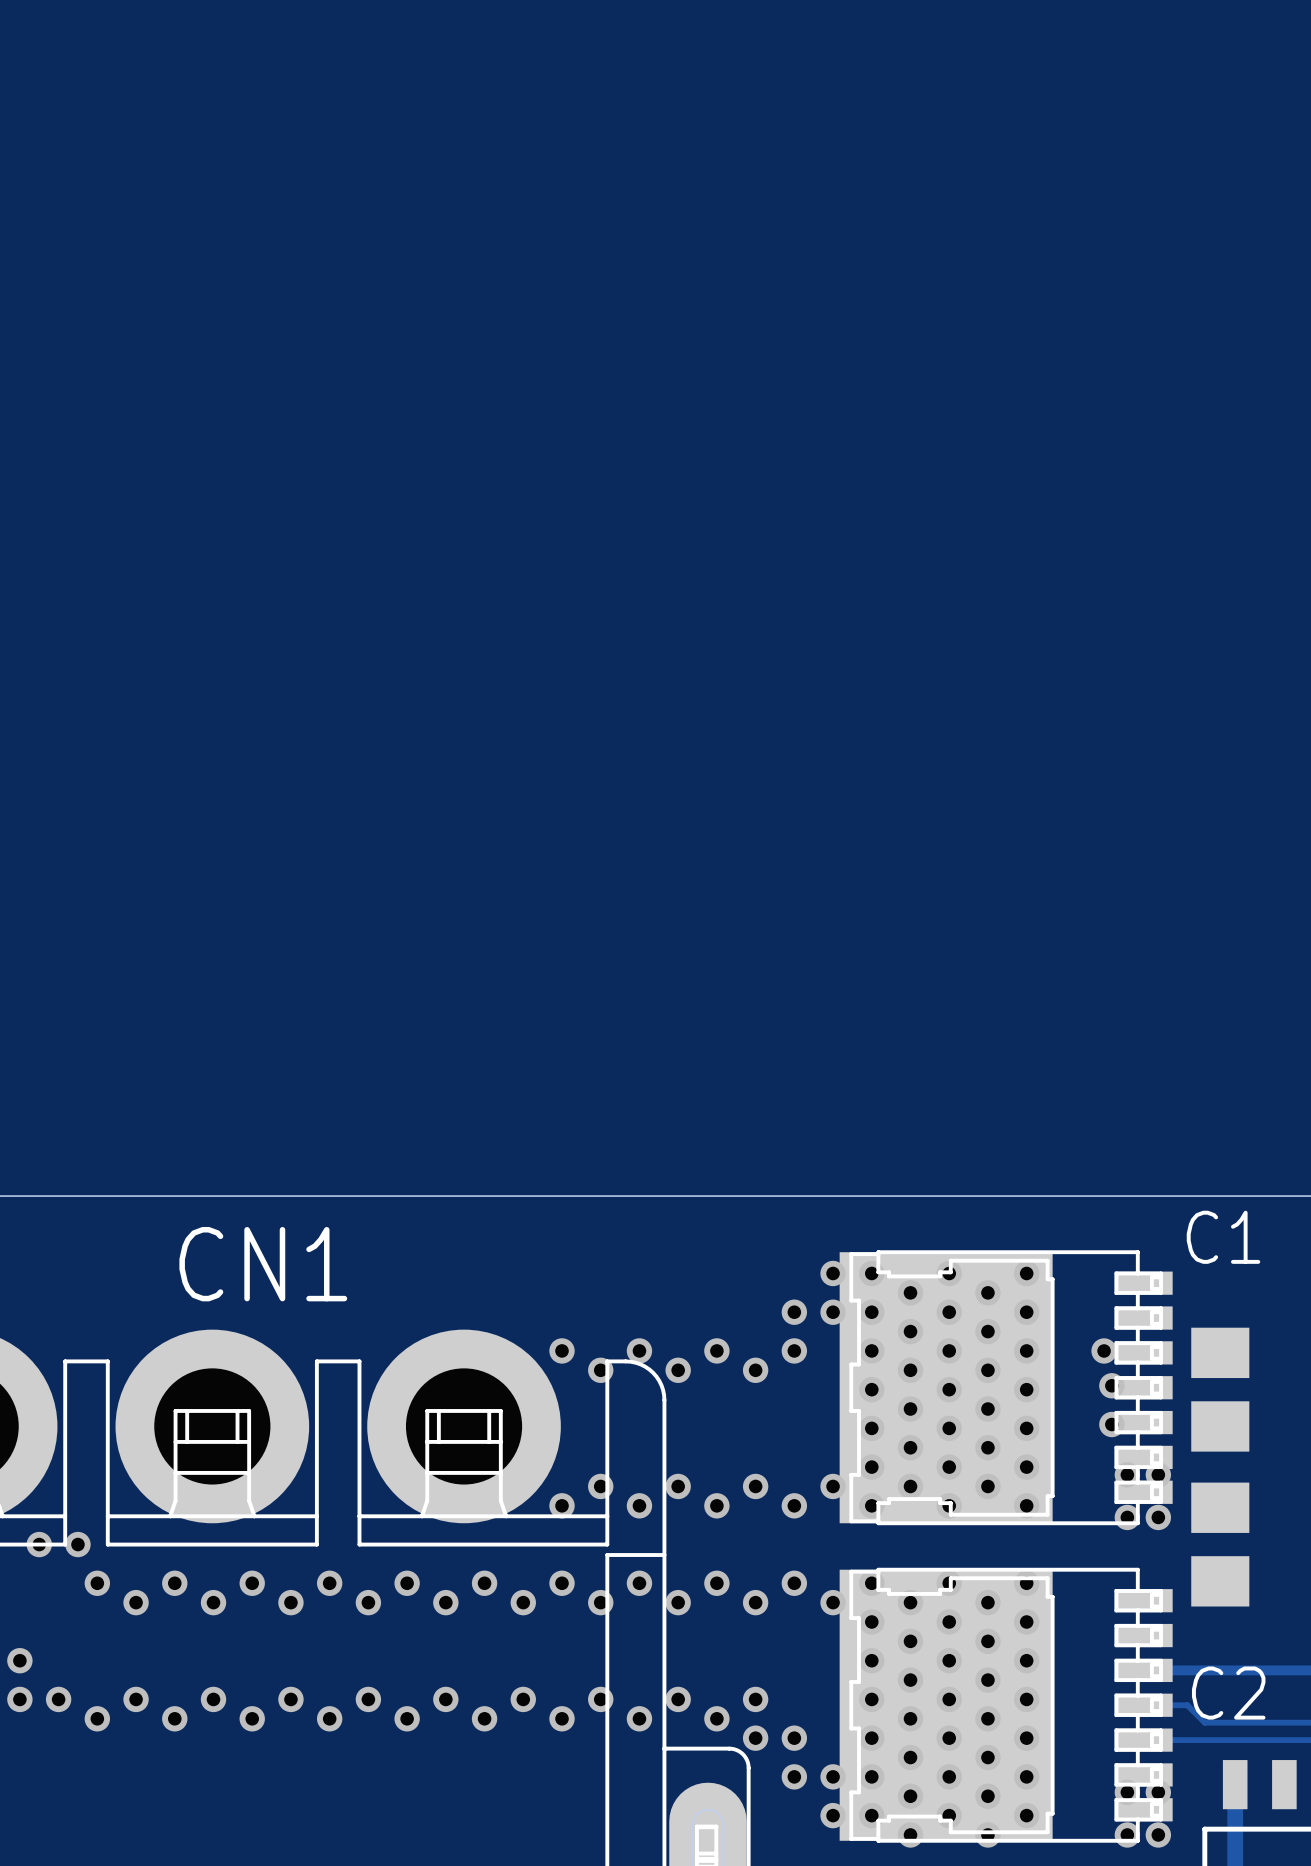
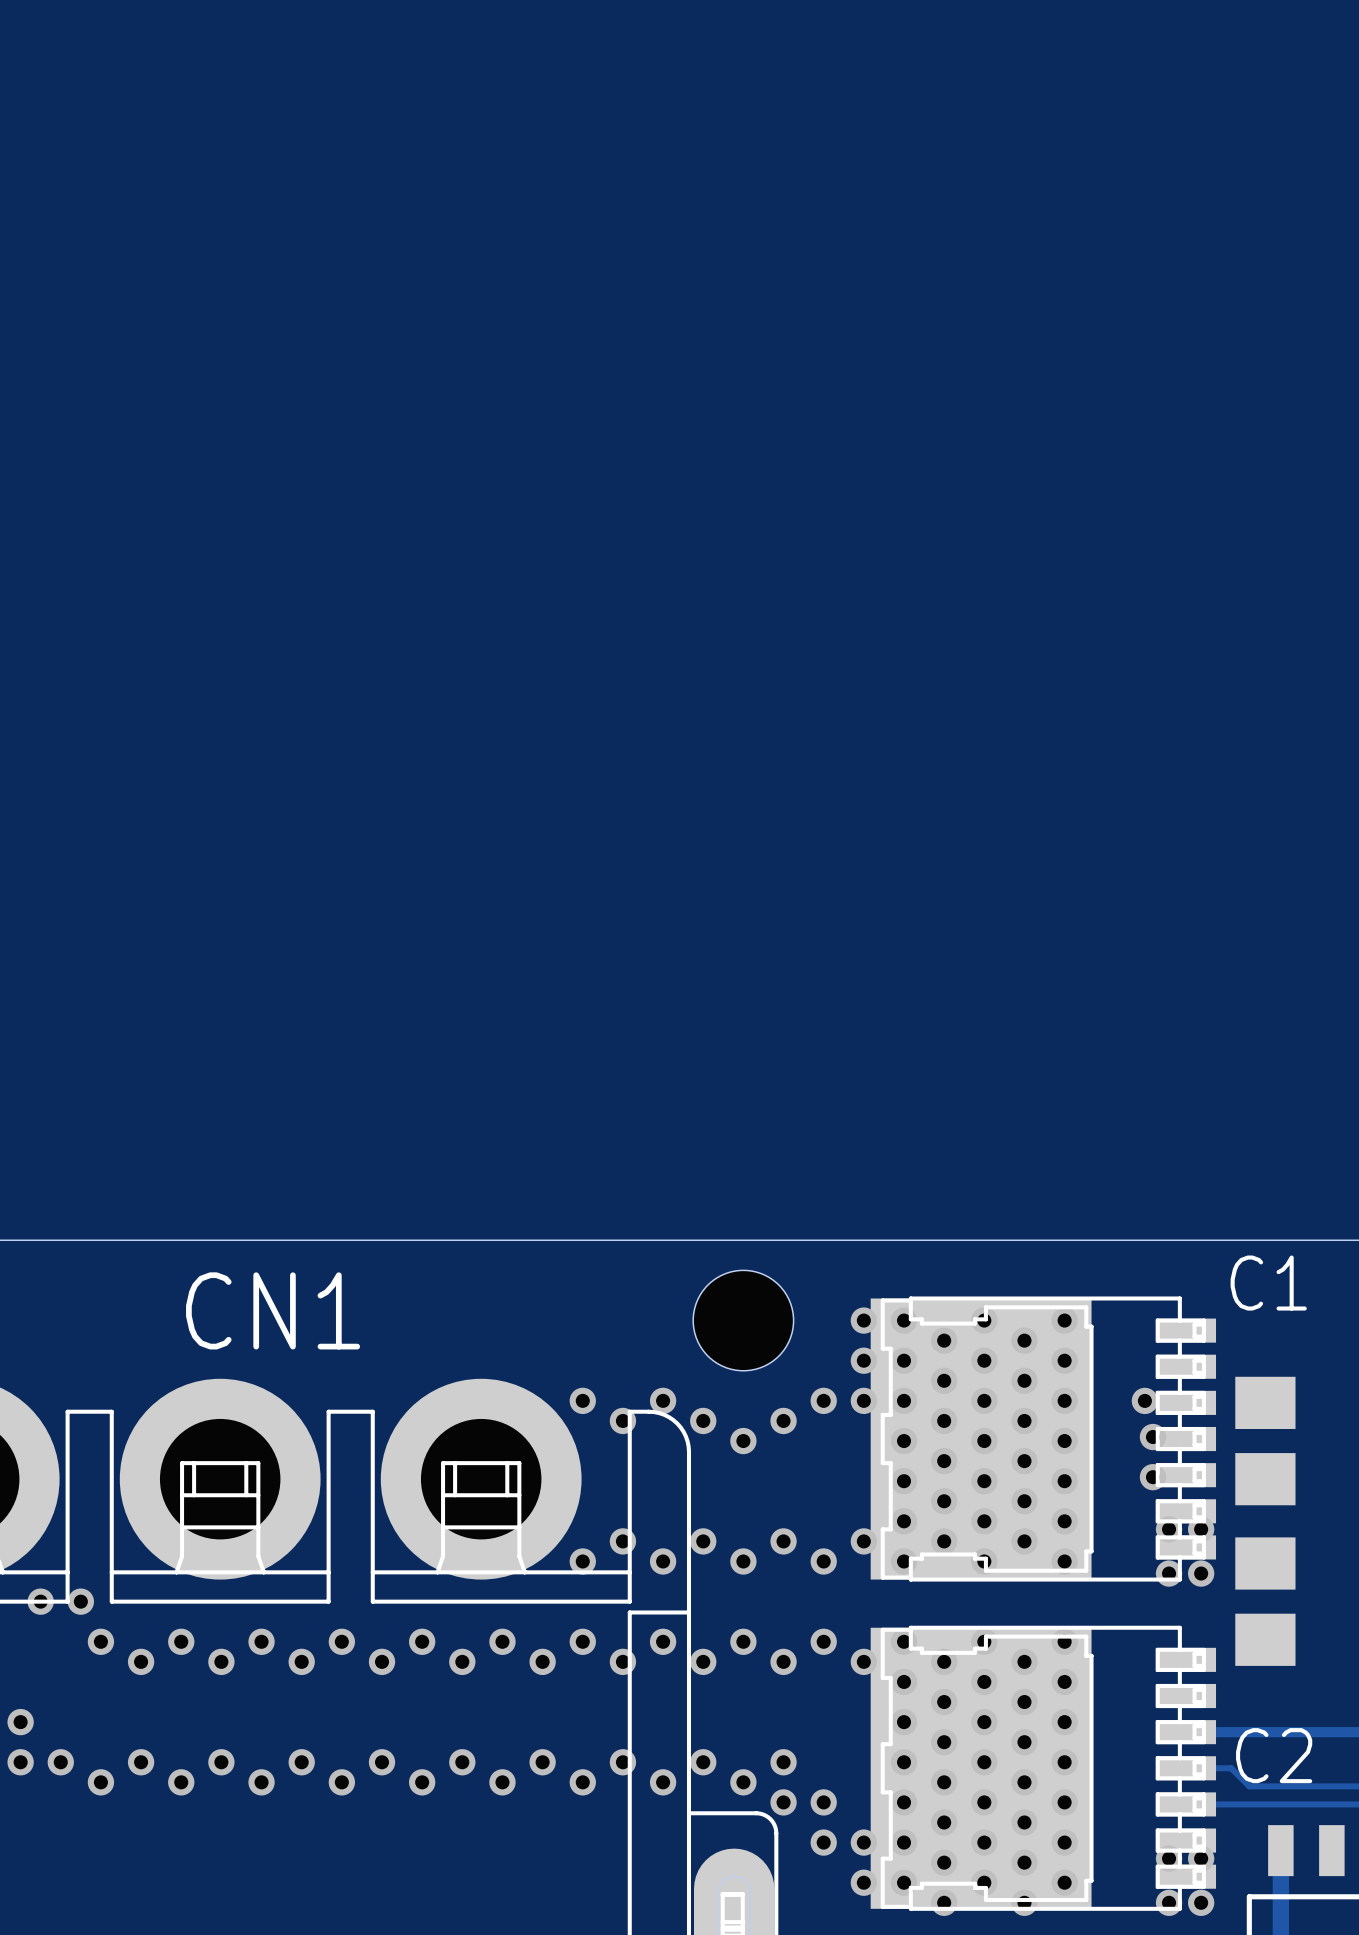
hole: none -> (743, 1320)
via: (794, 1312) -> none
via position: (716, 1350) -> (743, 1441)
via: none -> (863, 1400)

